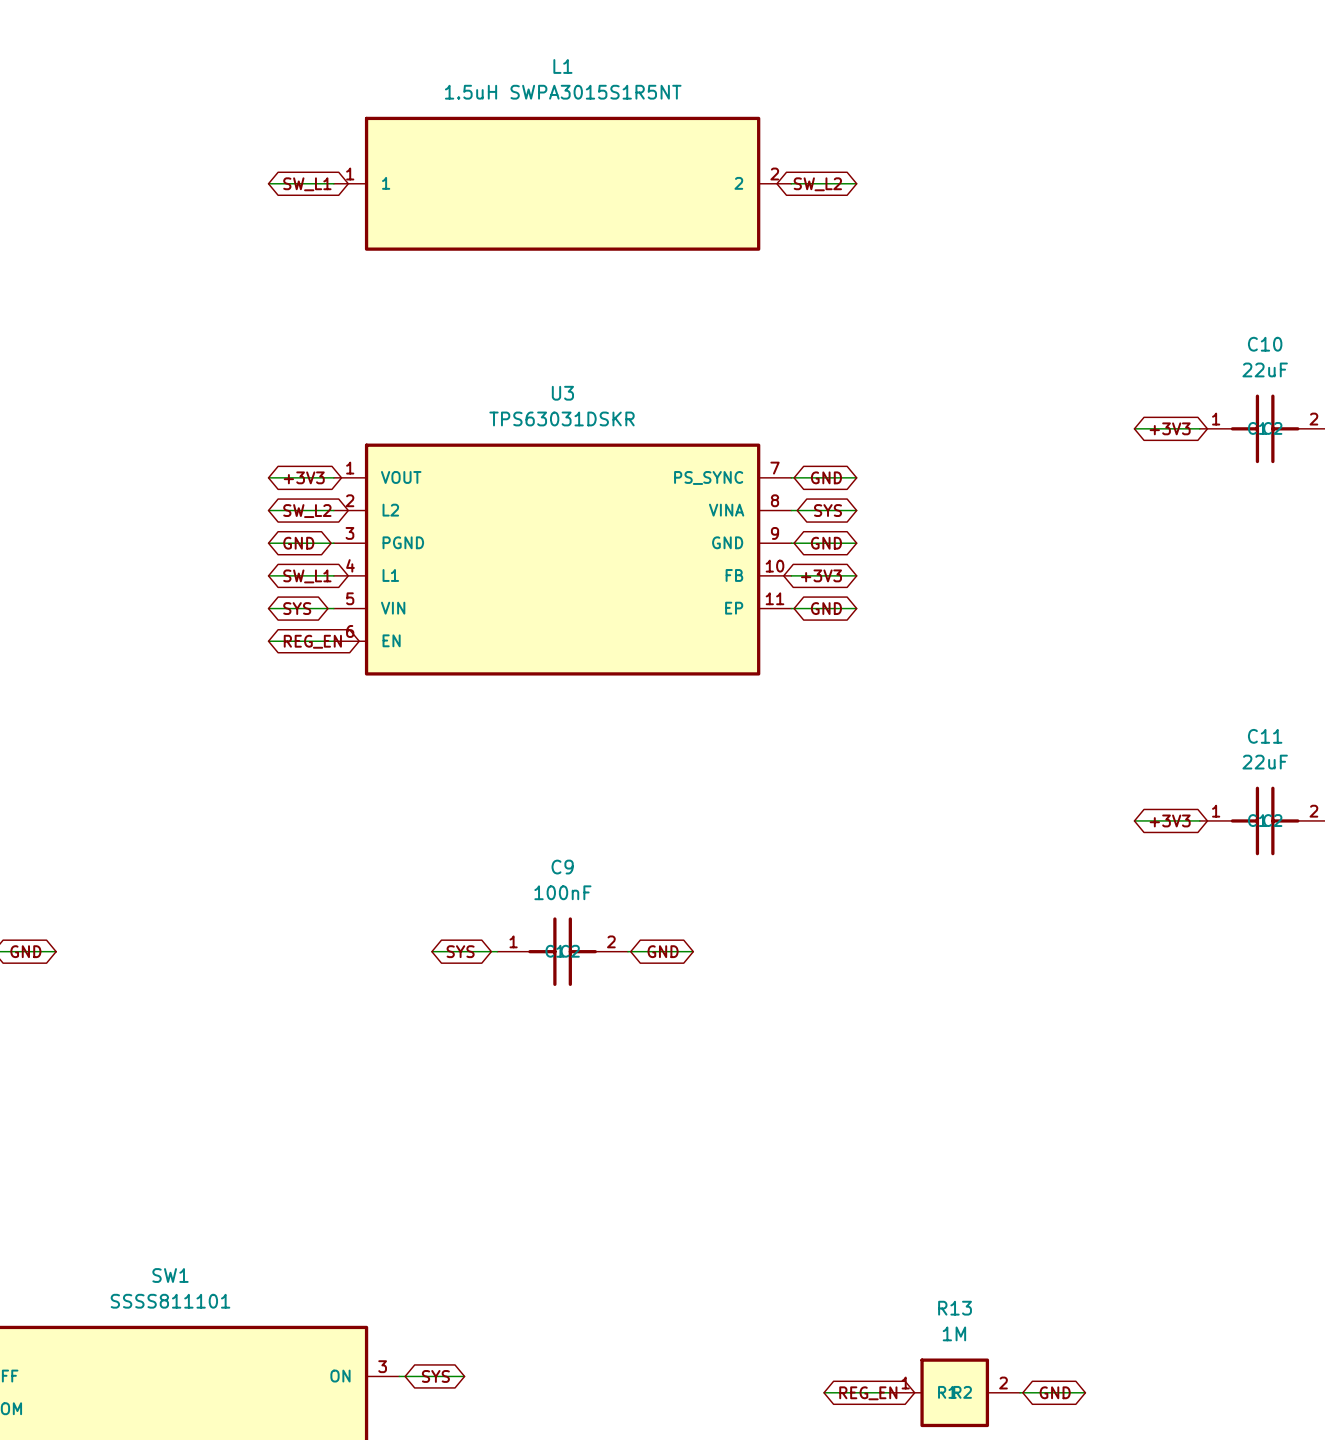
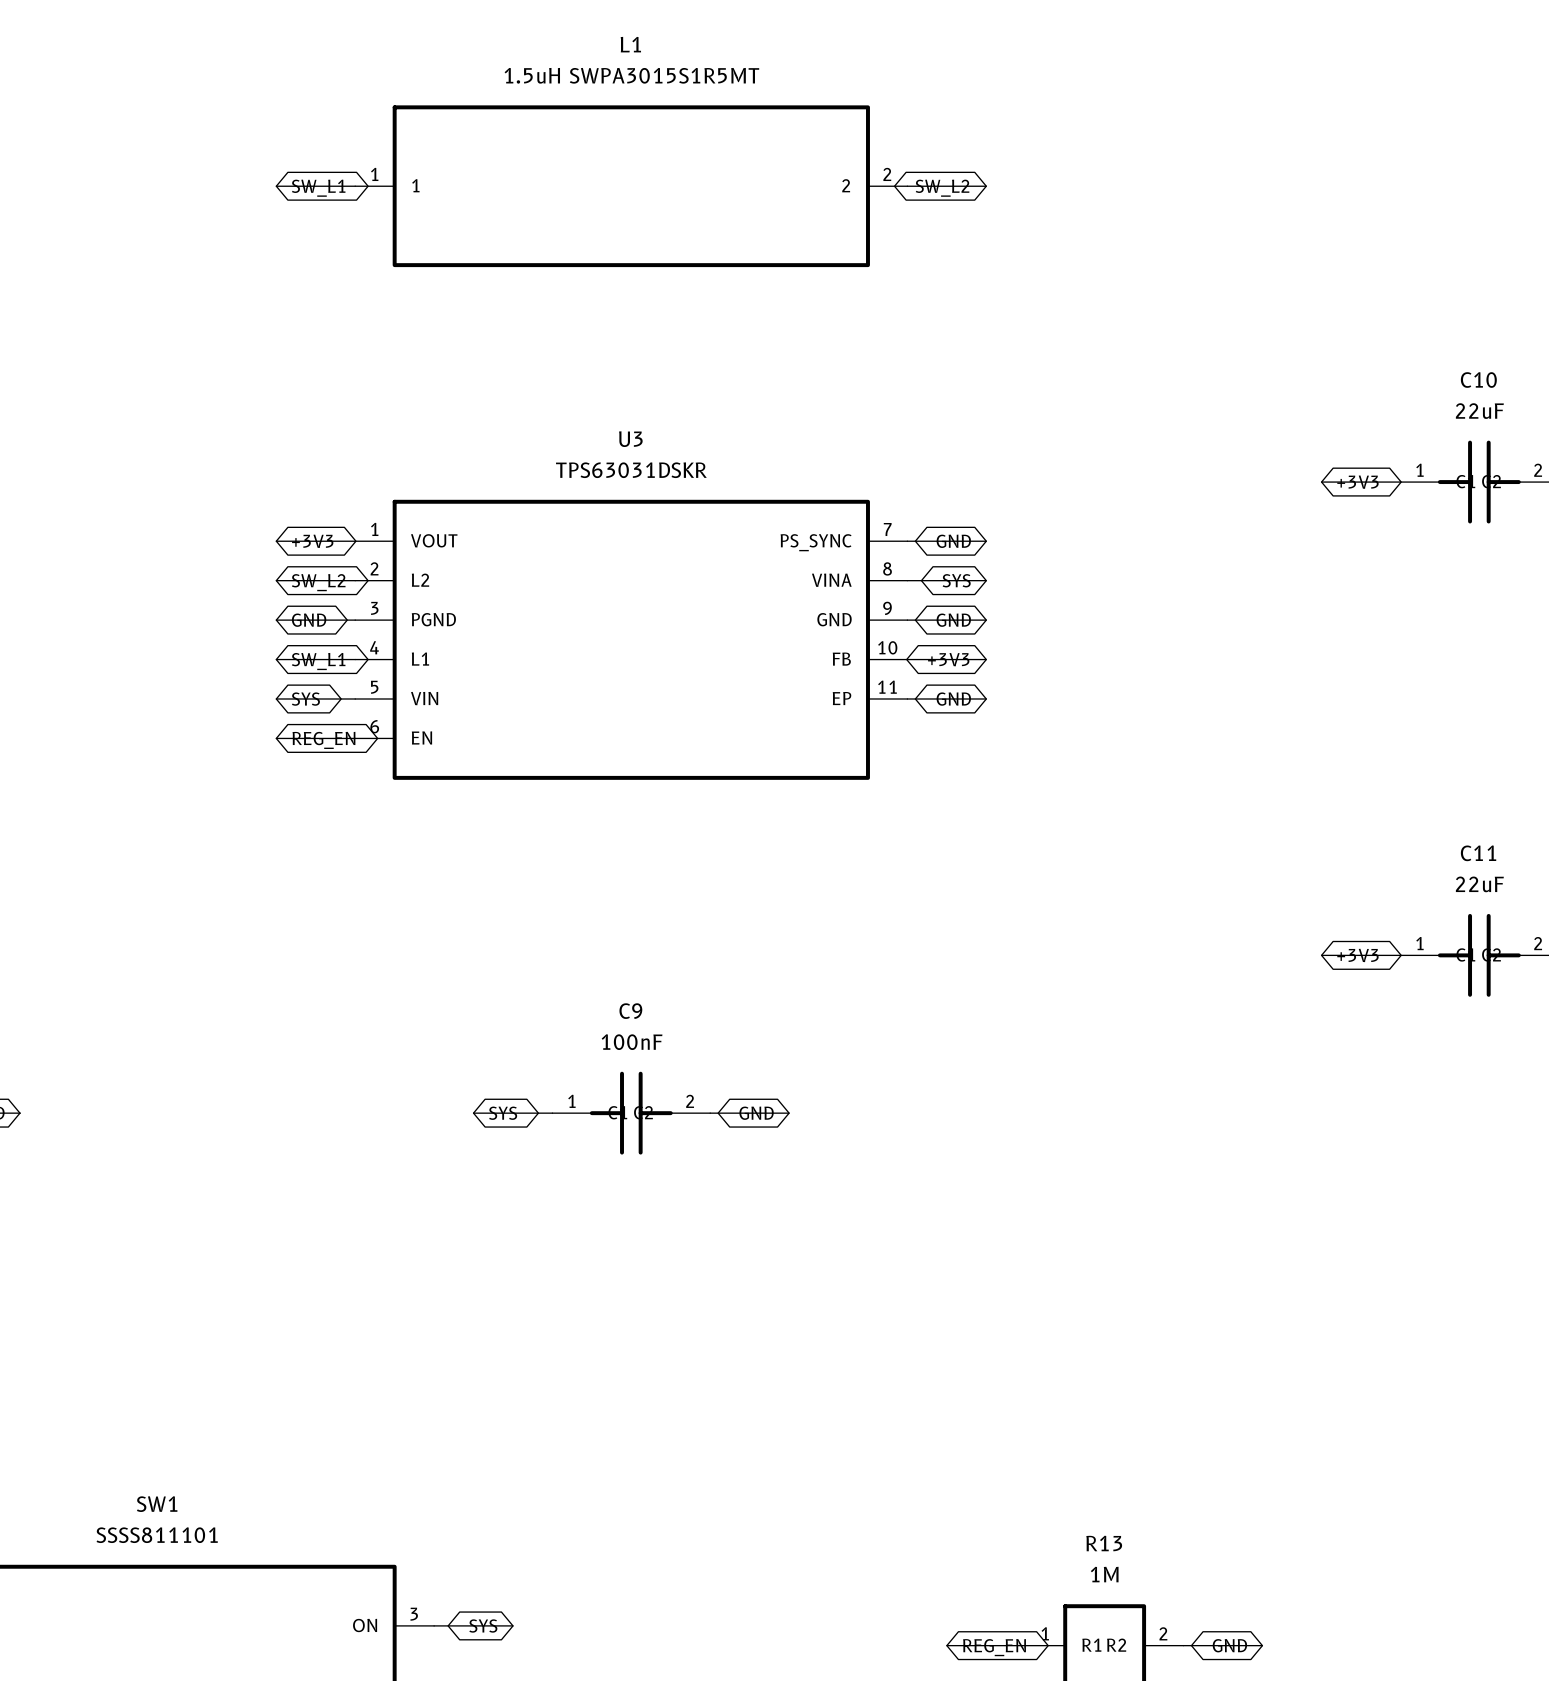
L1 value: 1.5uH SWPA3015S1R5NT (563, 92) -> 1.5uH SWPA3015S1R5MT (631, 75)

